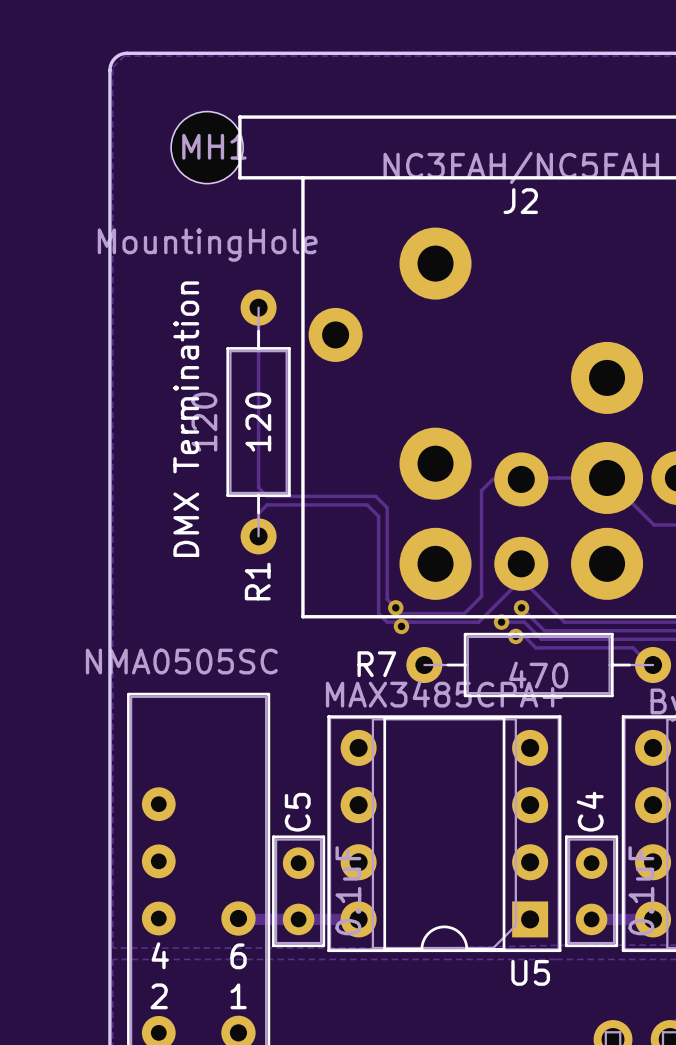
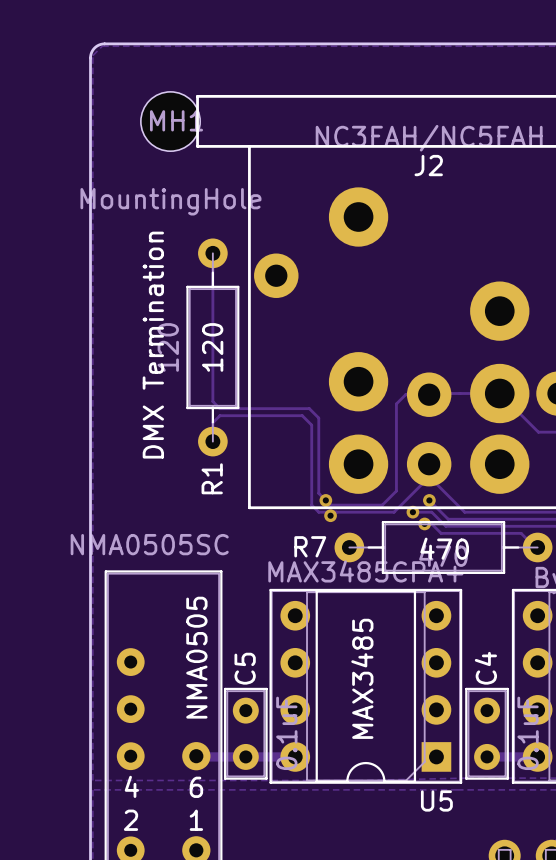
text: none -> 470 (444, 548)
text: none -> NMA0505 (196, 657)
text: none -> MAX3485 (362, 678)

